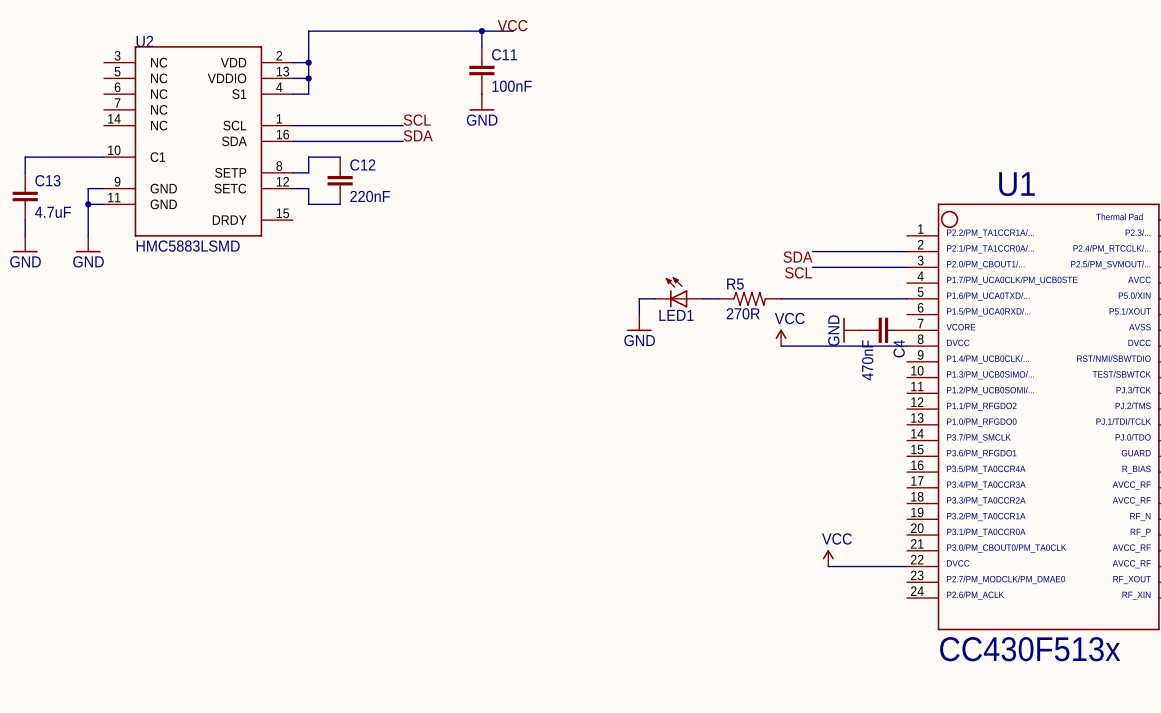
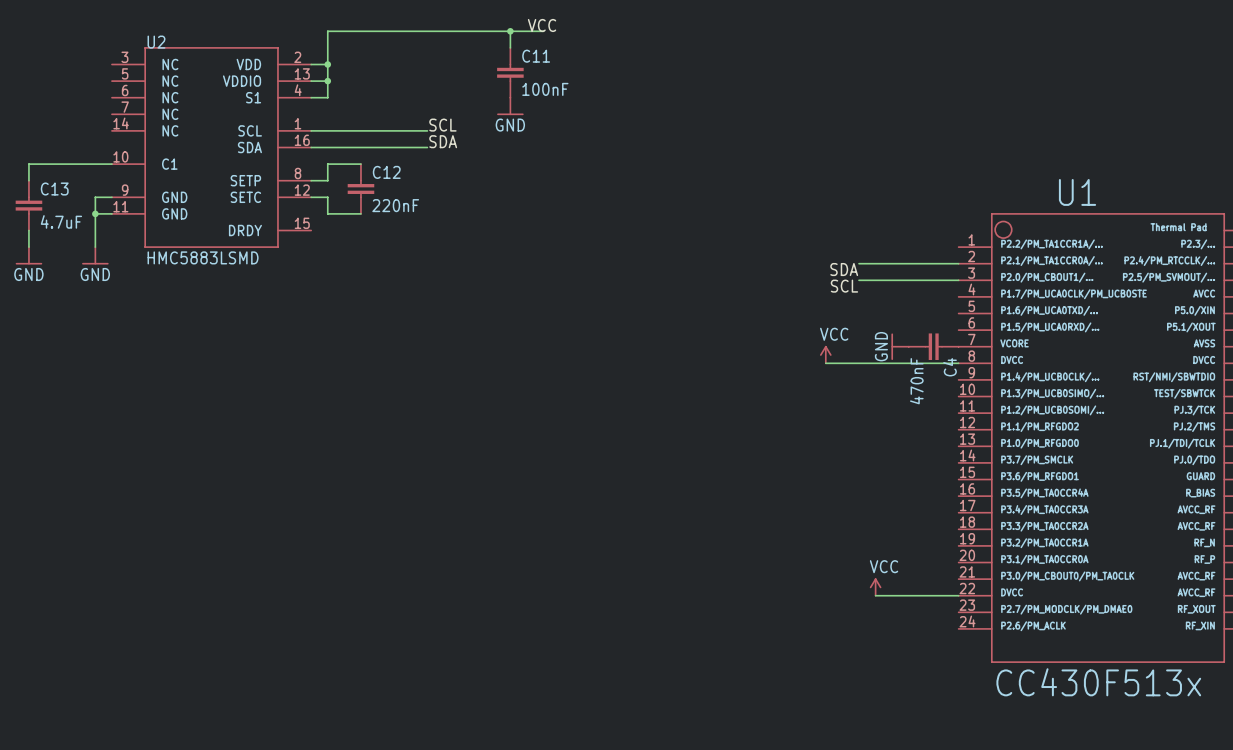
LED1: (678, 292) -> none
wire: (655, 298) (639, 298) (639, 314) -> none
wire: (702, 298) (718, 298) -> none
R5: 270R (749, 298) -> none
wire: (781, 298) (907, 298) -> none
power symbol: GND (639, 322) -> none

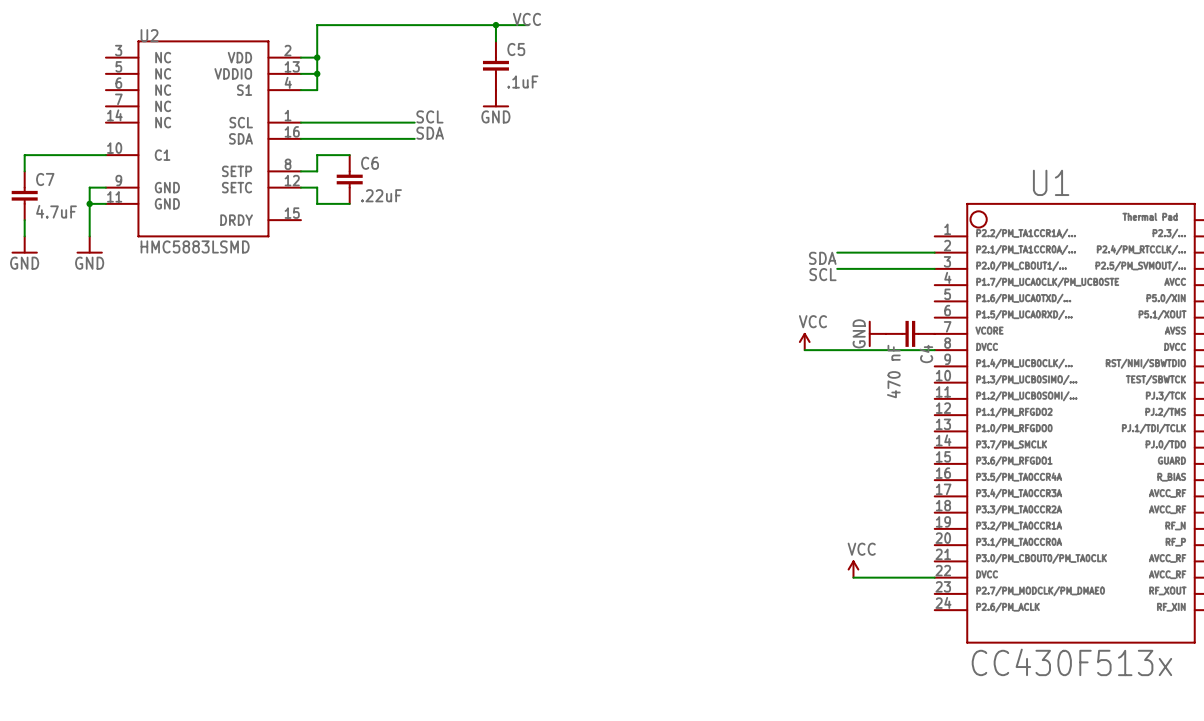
C11 name: C11 (536, 56) -> C5 (516, 49)
C11 value: 100nF (545, 89) -> .1uF (522, 82)
C12 name: C12 (386, 172) -> C6 (370, 163)
C13 name: C13 (54, 189) -> C7 (45, 179)
C12 value: 220nF (395, 205) -> .22uF (381, 195)
C4 value: 470nF (916, 381) -> 470 nF (893, 371)

